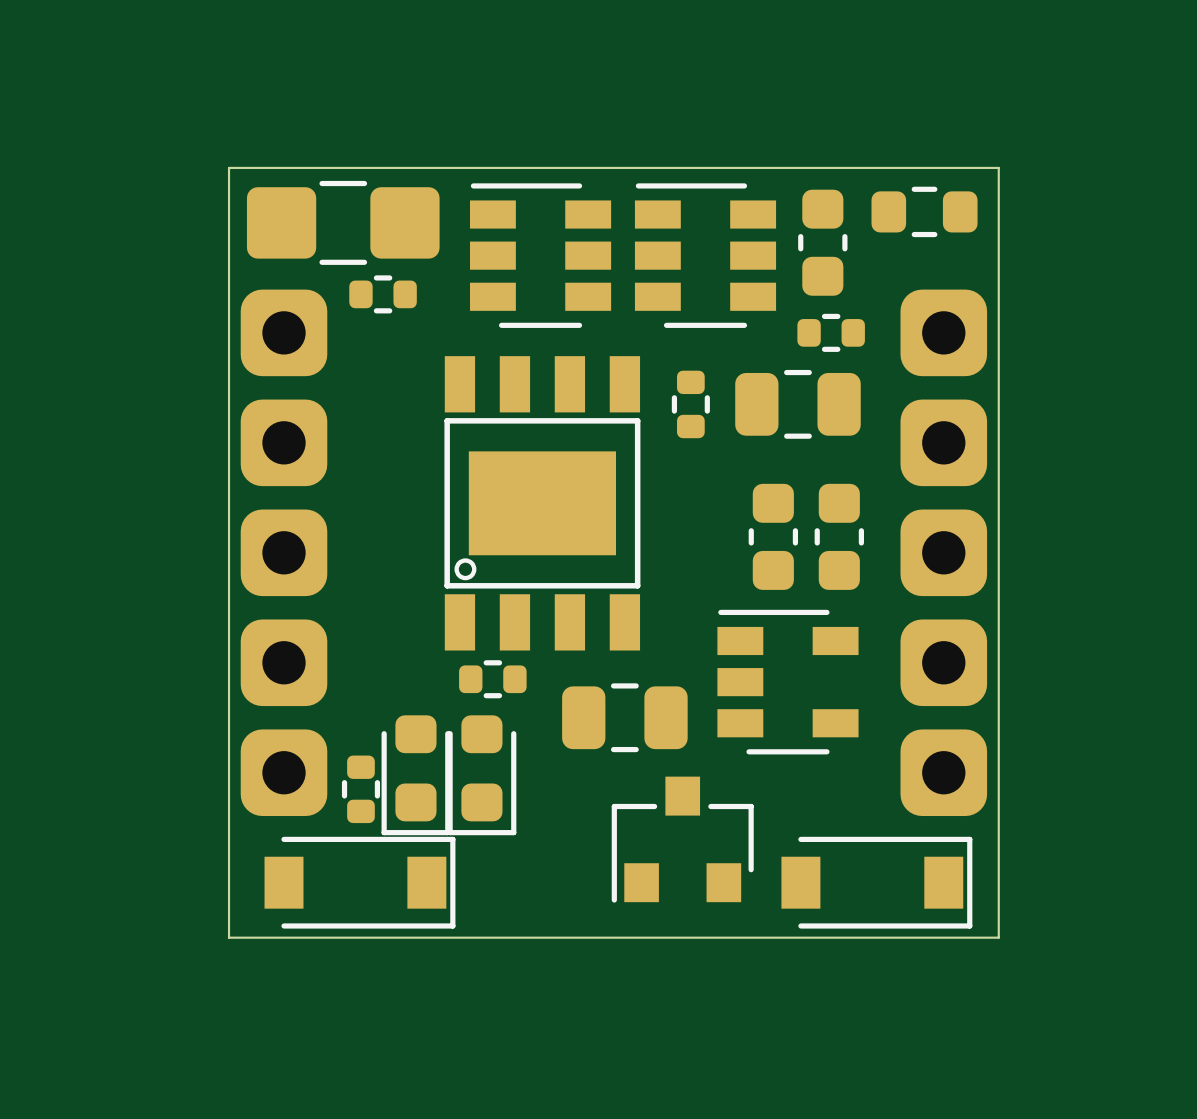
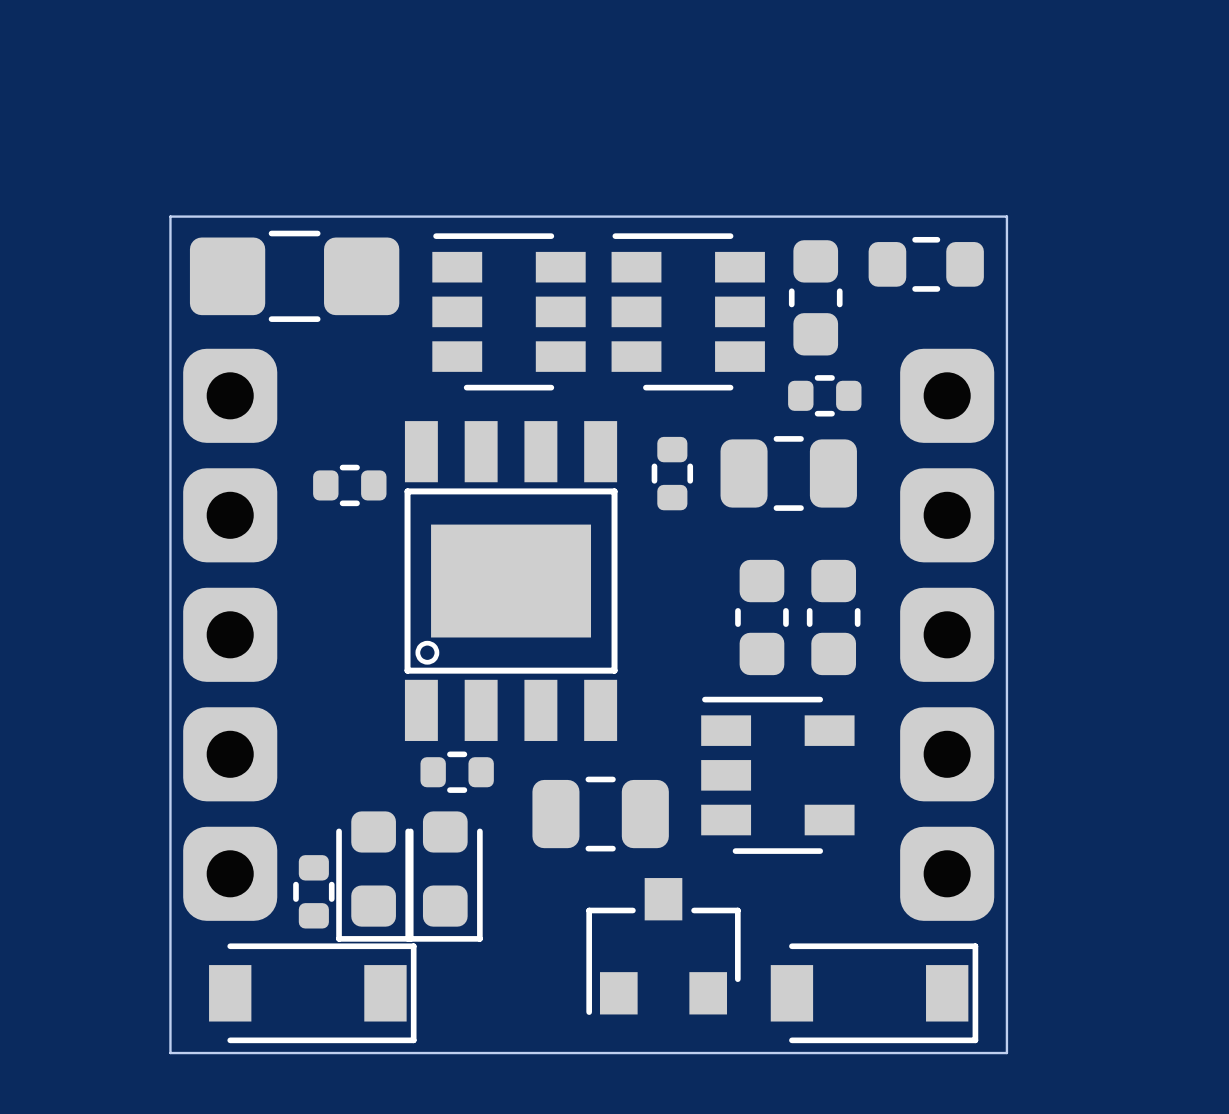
part position: (383, 294) -> (349, 485)

